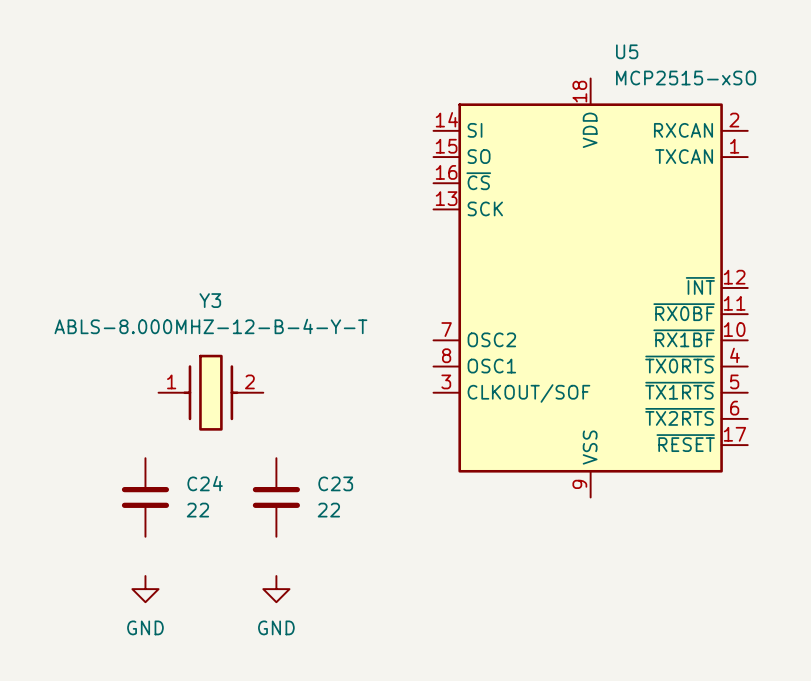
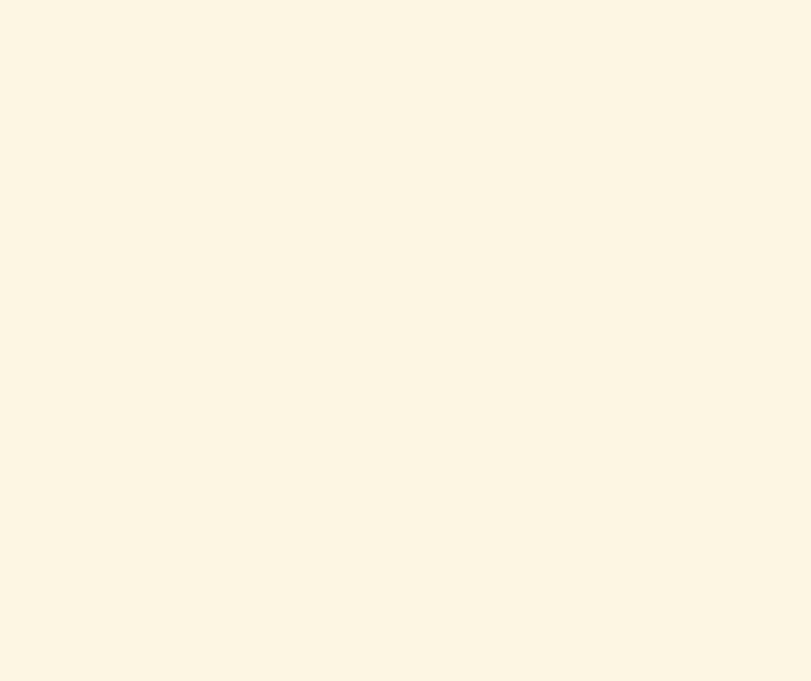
U5: MCP2515-xSO (590, 287) -> none
Y3: ABLS-8.000MHZ-12-B-4-Y-T (210, 392) -> none
C24: 22 (145, 497) -> none
C23: 22 (276, 497) -> none
power symbol: GND (145, 589) -> none
power symbol: GND (276, 589) -> none

